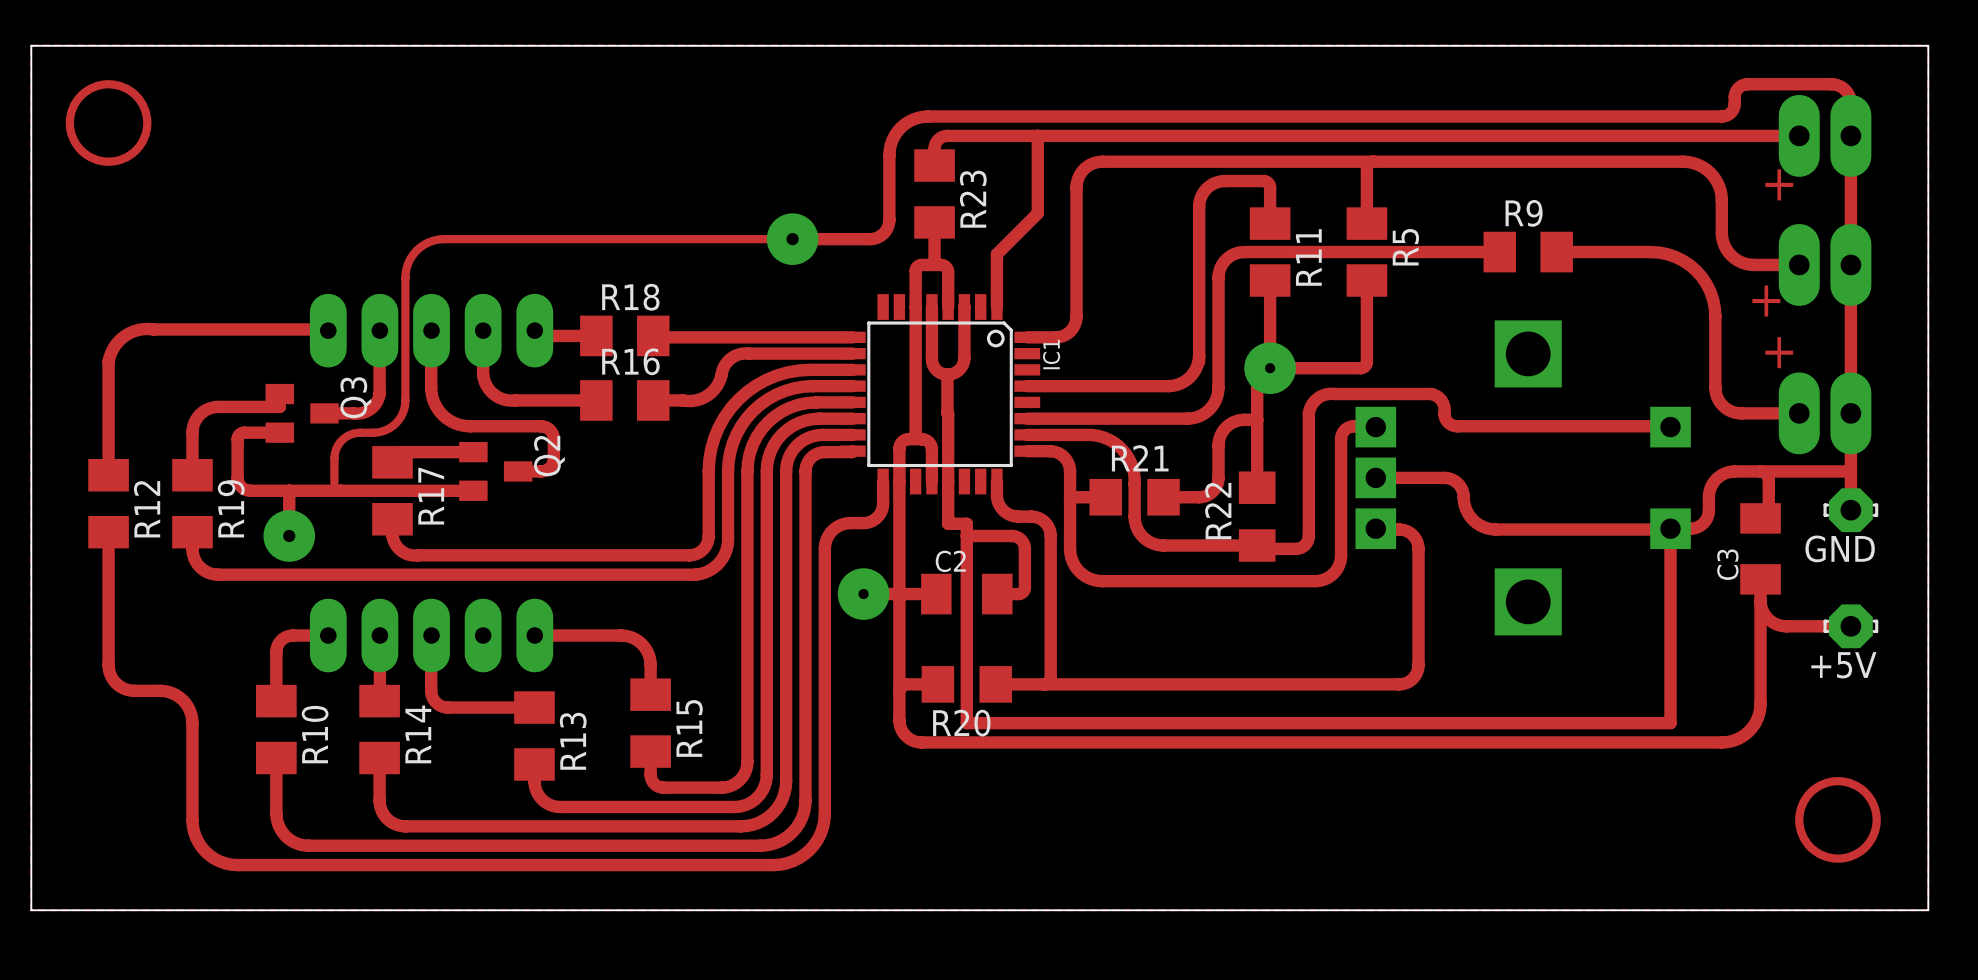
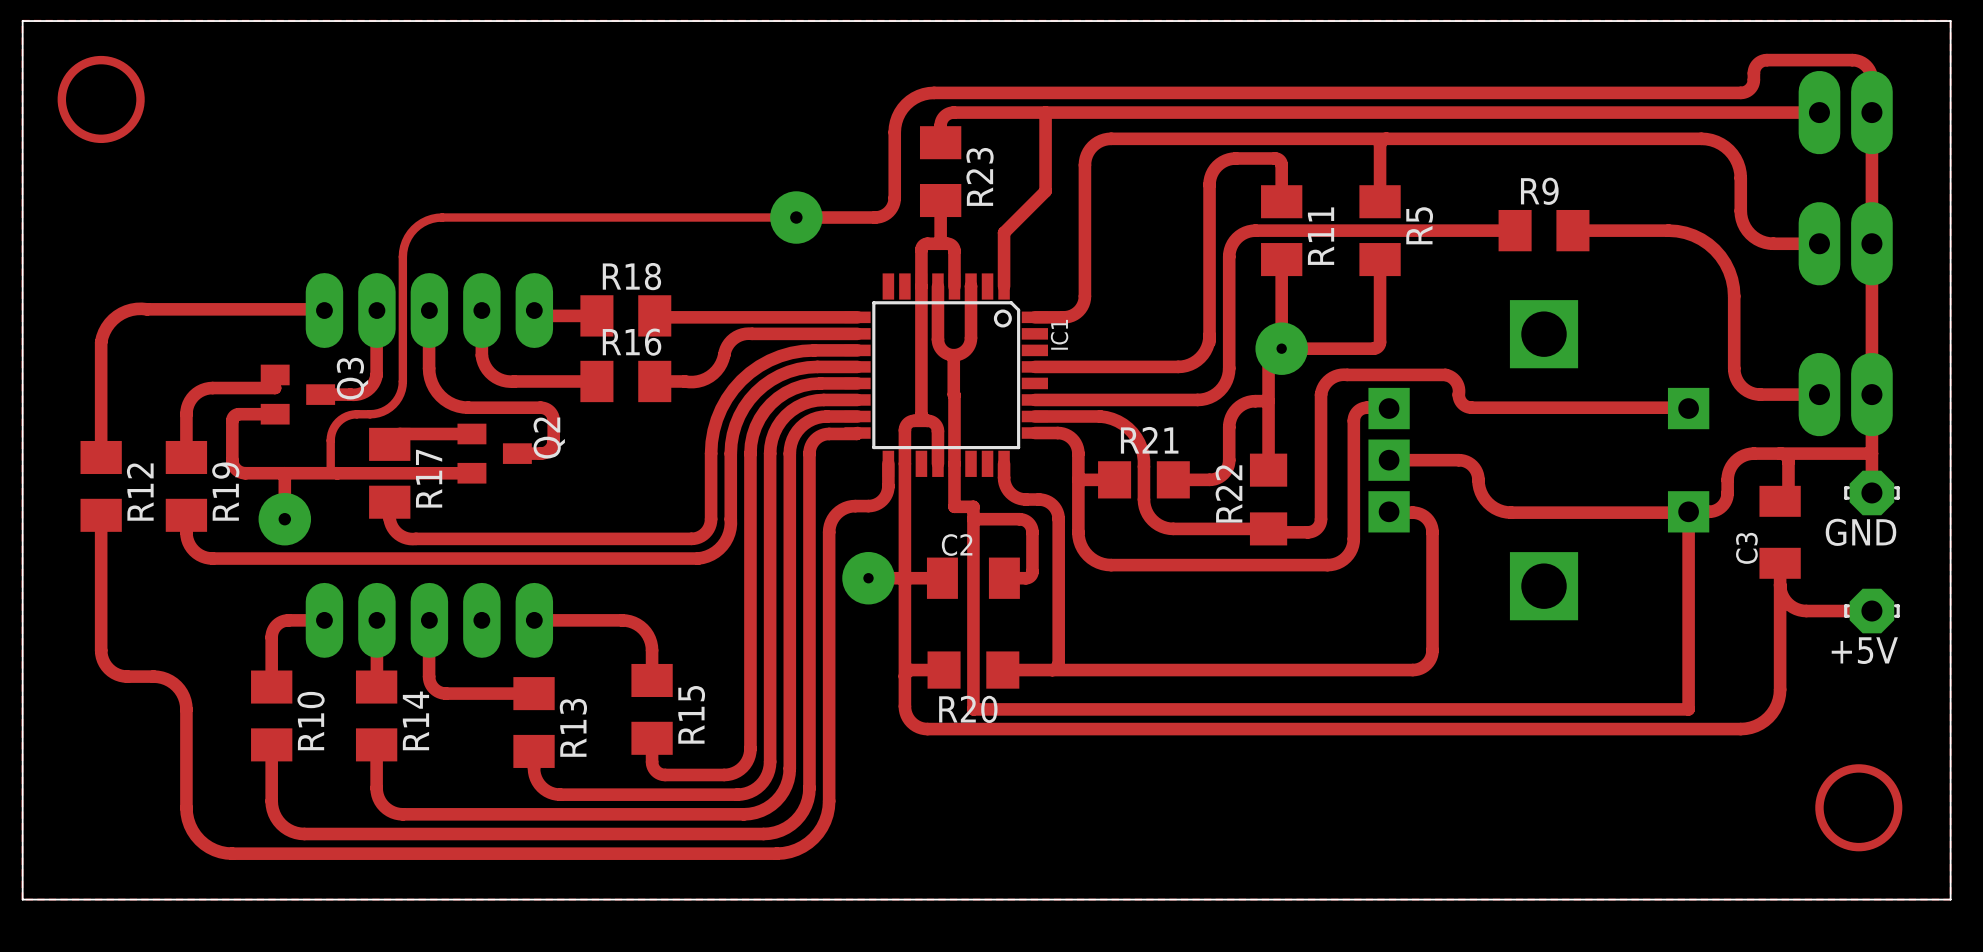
text: + (1779, 184) -> none
text: + (1766, 301) -> none
text: + (1779, 352) -> none

